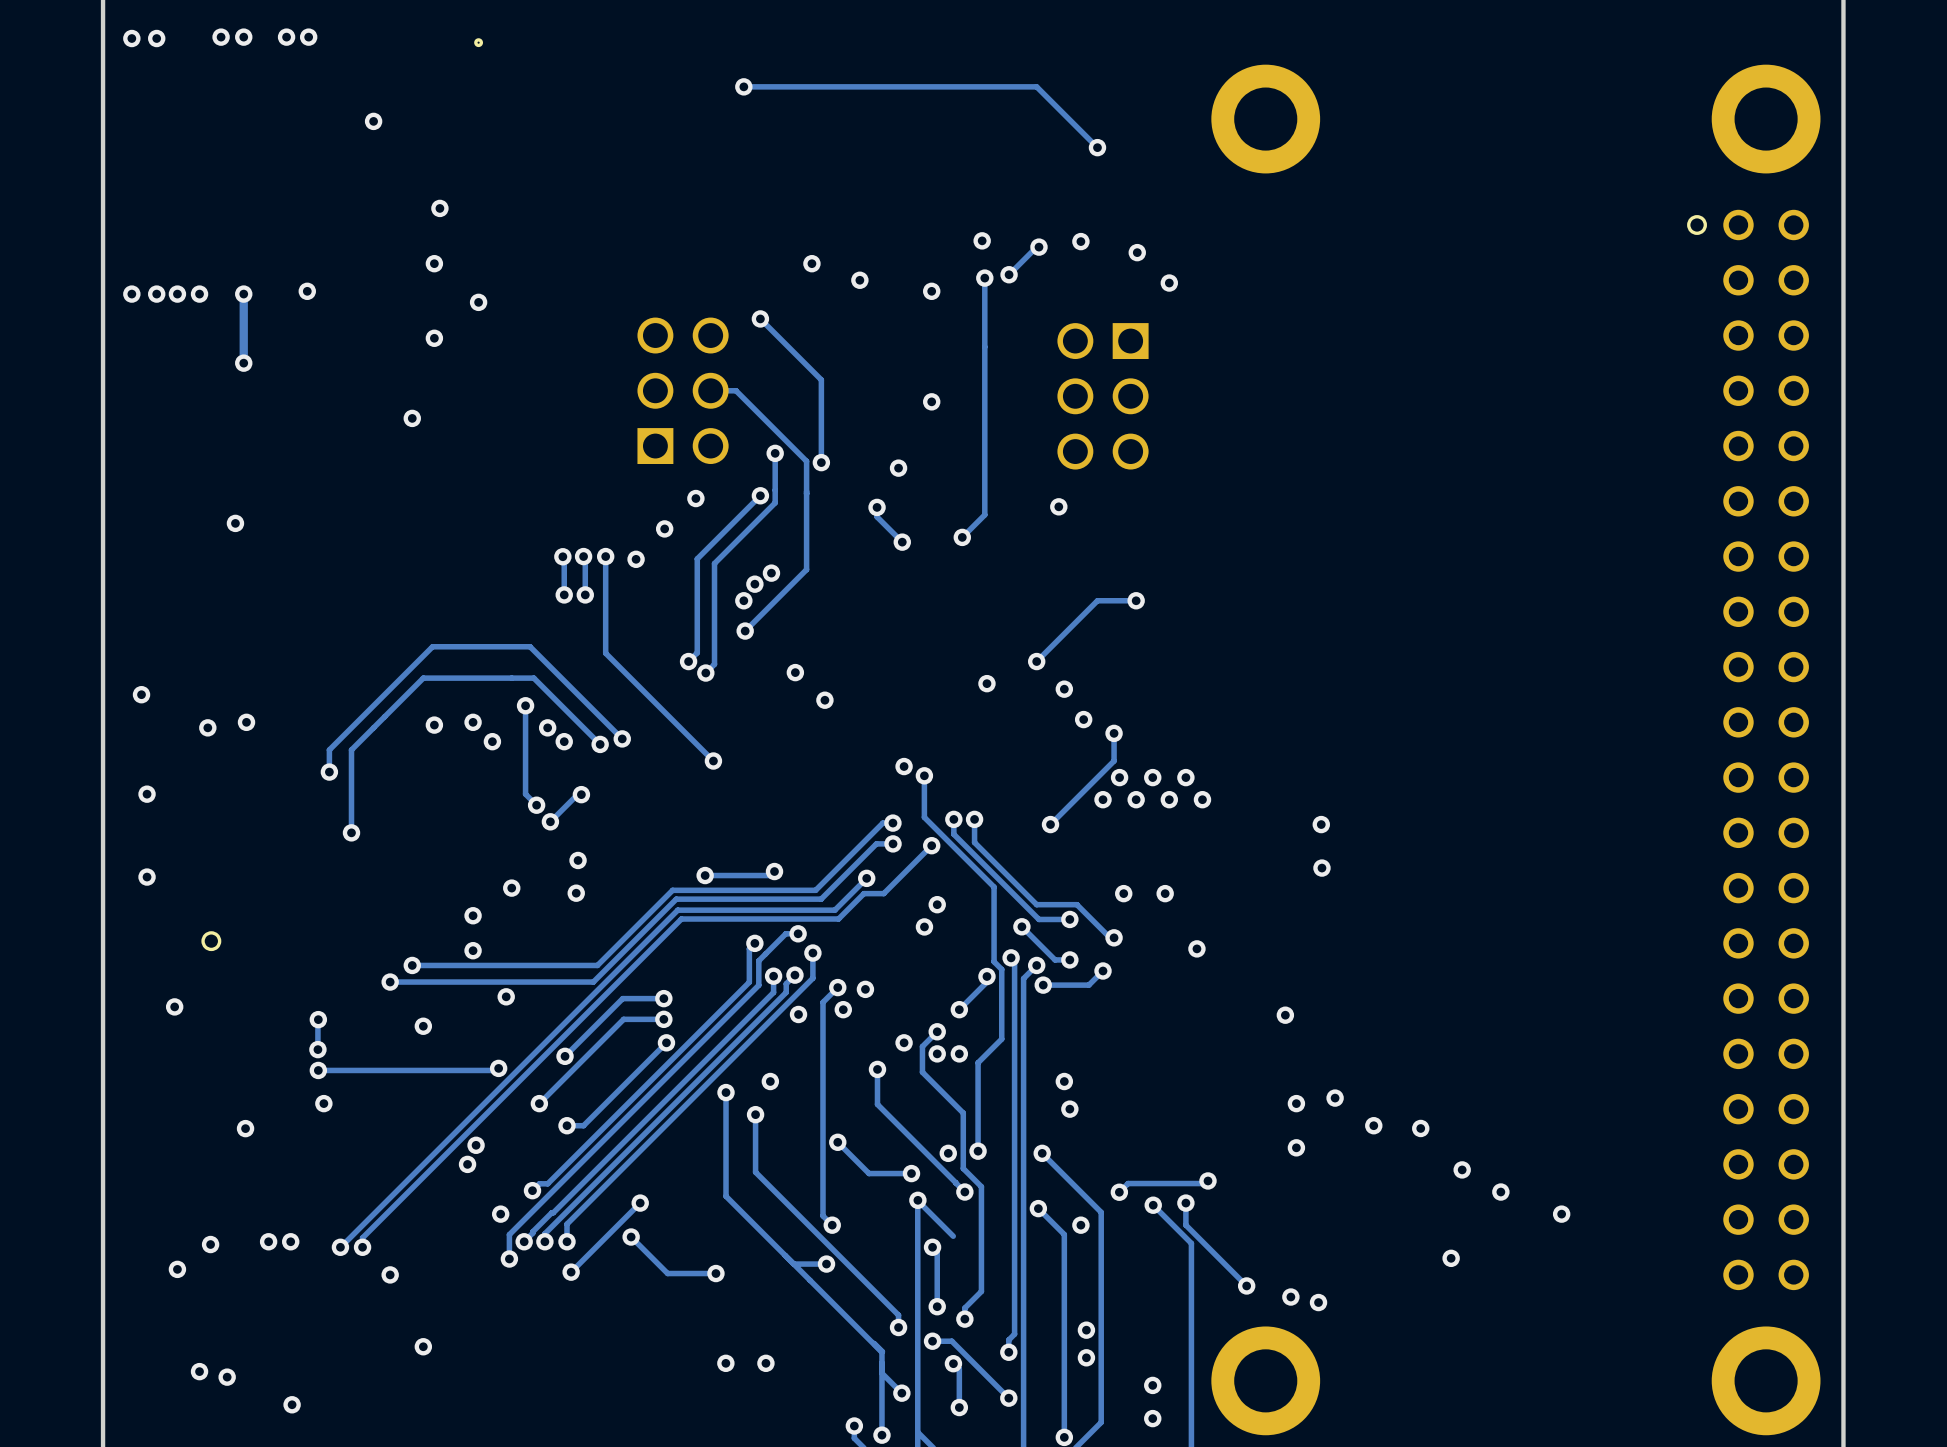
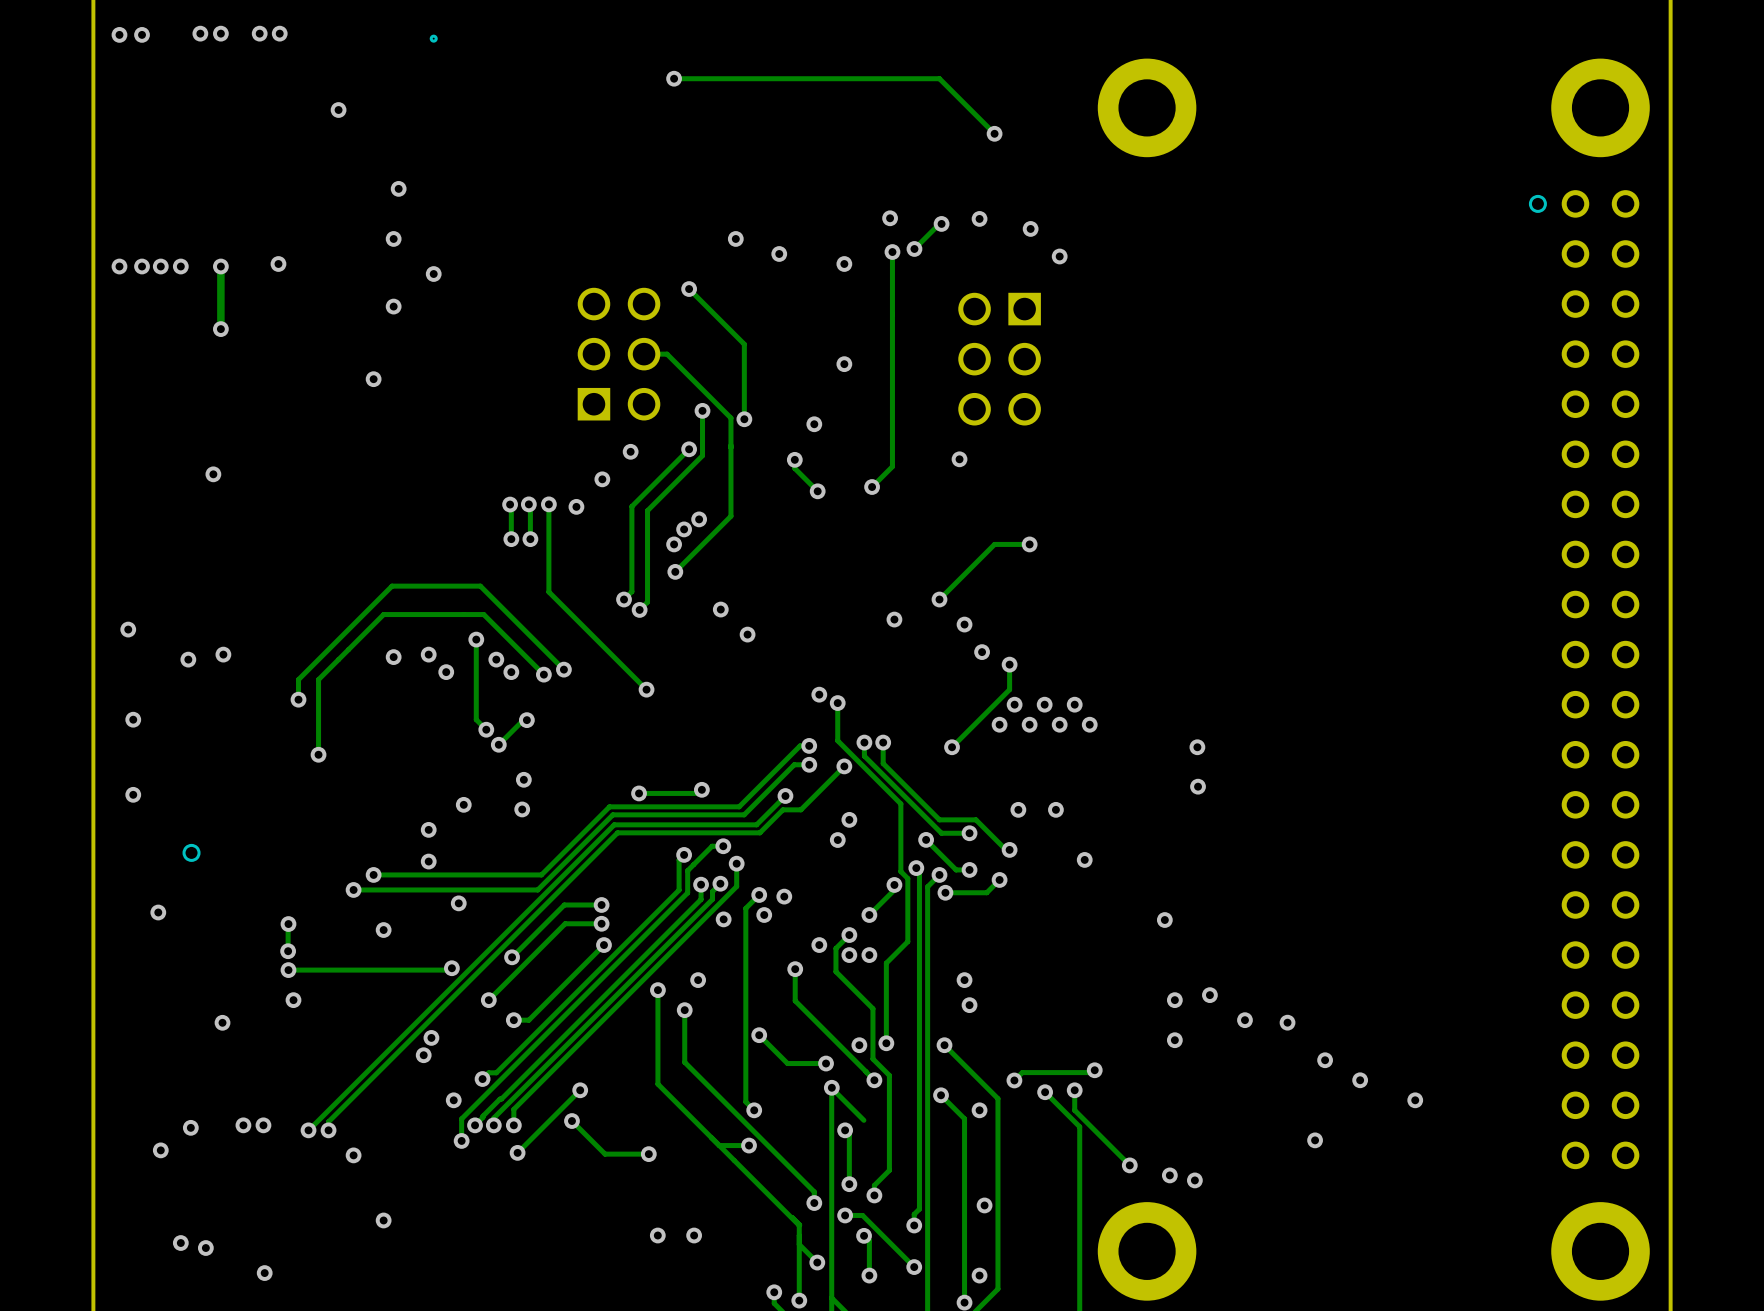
via: (1086, 1357) -> none
via: (1152, 1385) -> none
via: none -> (979, 1275)
via: (1152, 1418) -> none

